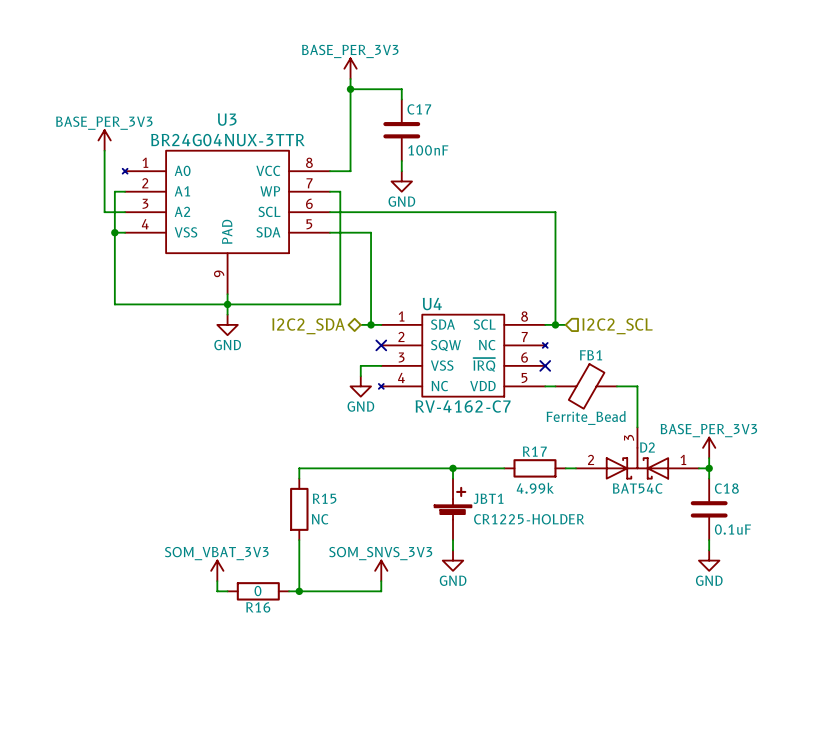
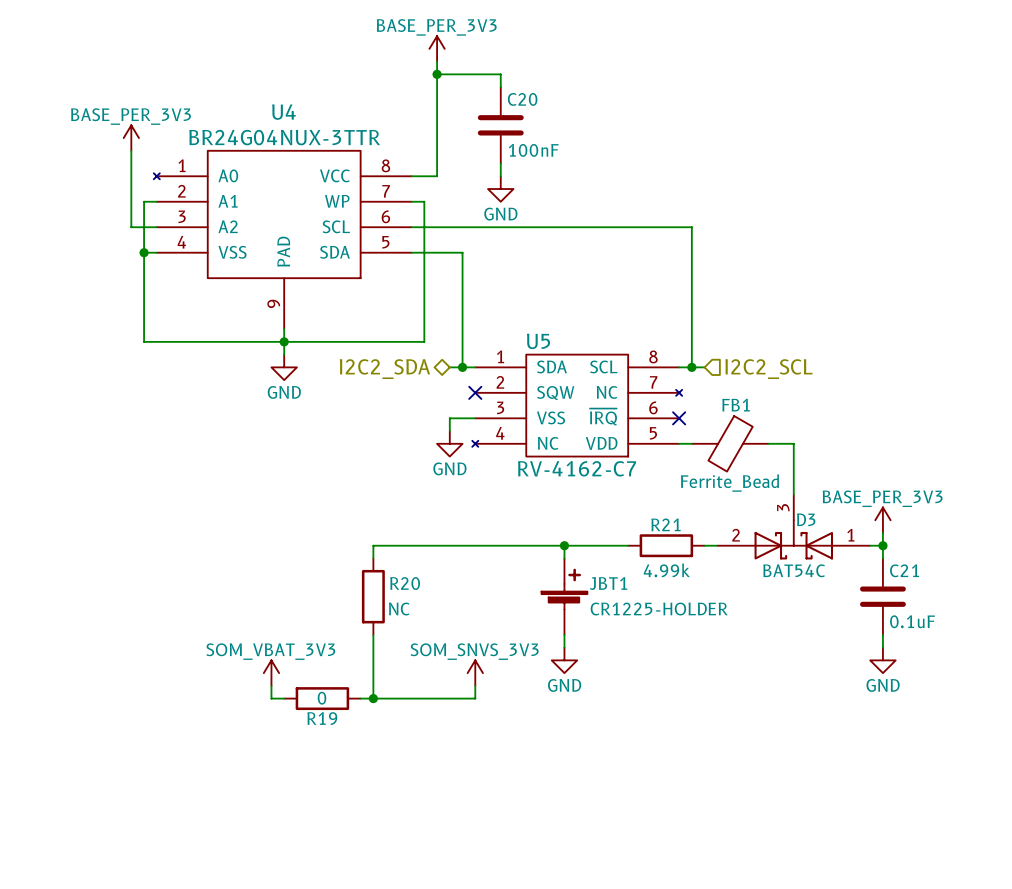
C17 name: C17 (419, 109) -> C20 (522, 99)
U3 name: U3 (227, 119) -> U4 (283, 112)
U4 name: U4 (432, 304) -> U5 (538, 341)
D2 name: D2 (647, 447) -> D3 (806, 519)
R17 name: R17 (534, 451) -> R21 (665, 524)
C18 name: C18 (726, 488) -> C21 (904, 570)
R15 name: R15 (324, 498) -> R20 (405, 583)
R16 name: R16 (258, 607) -> R19 (322, 718)

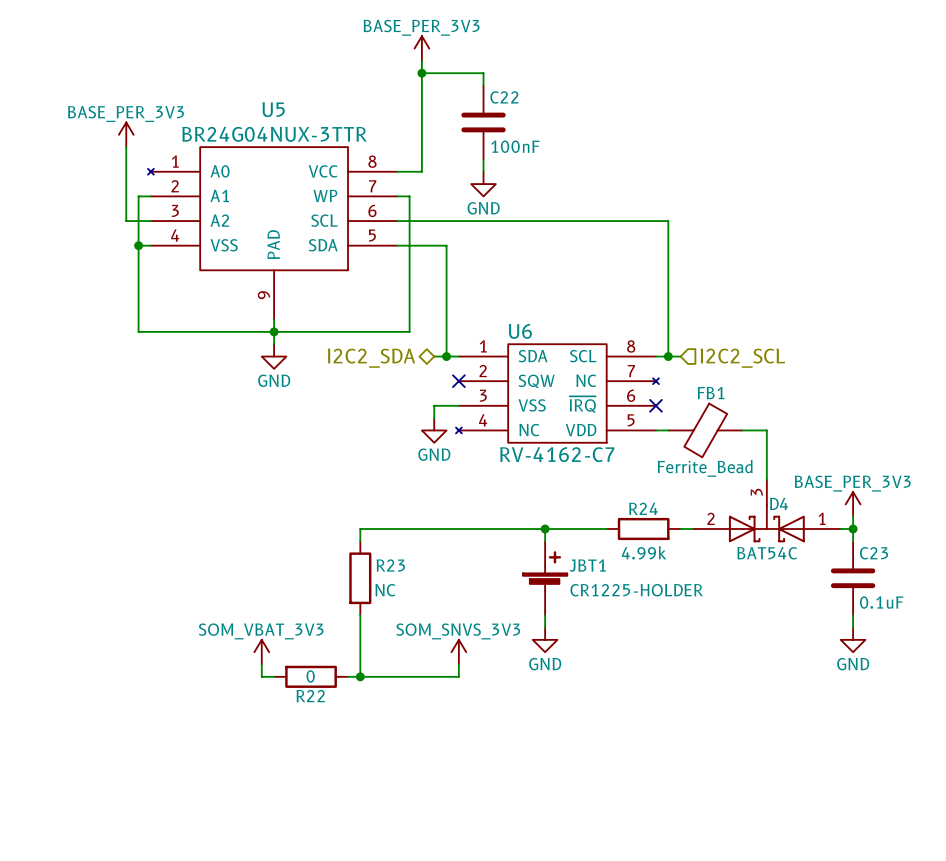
C20 name: C20 (522, 99) -> C22 (504, 97)
U4 name: U4 (283, 112) -> U5 (273, 109)
U5 name: U5 (538, 341) -> U6 (520, 331)
D3 name: D3 (806, 519) -> D4 (779, 503)
R21 name: R21 (665, 524) -> R24 (643, 508)
C21 name: C21 (904, 570) -> C23 (874, 553)
R20 name: R20 (405, 583) -> R23 (390, 565)
R19 name: R19 (322, 718) -> R22 (310, 696)

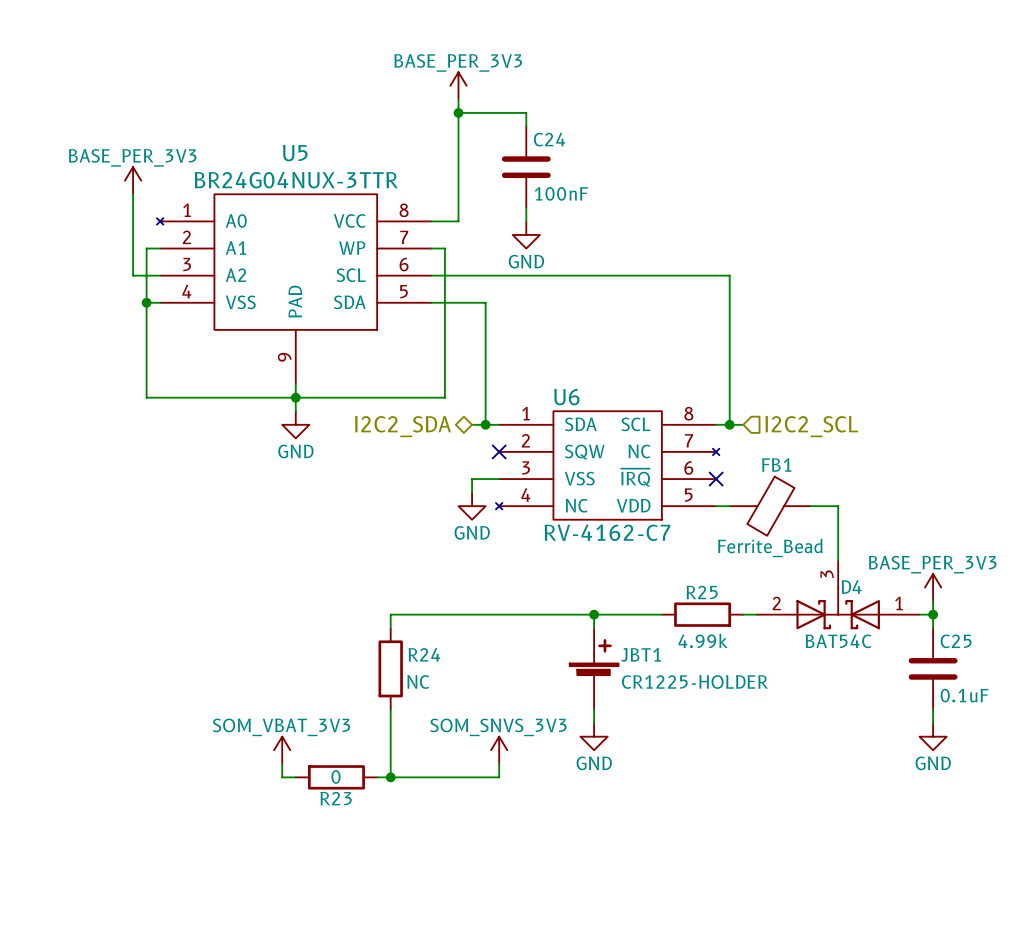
C22 name: C22 (504, 97) -> C24 (549, 139)
R24 name: R24 (643, 508) -> R25 (702, 592)
C23 name: C23 (874, 553) -> C25 (956, 641)
R23 name: R23 (390, 565) -> R24 (424, 654)
R22 name: R22 (310, 696) -> R23 (336, 798)

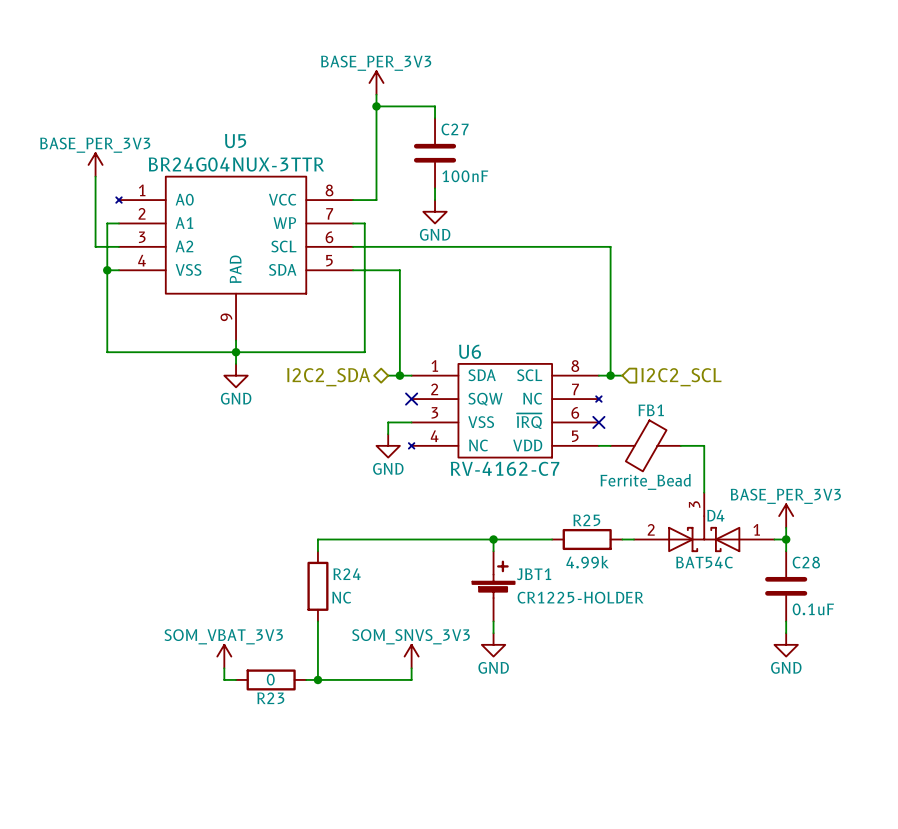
C24 name: C24 (549, 139) -> C27 (455, 129)
C25 name: C25 (956, 641) -> C28 (806, 562)

